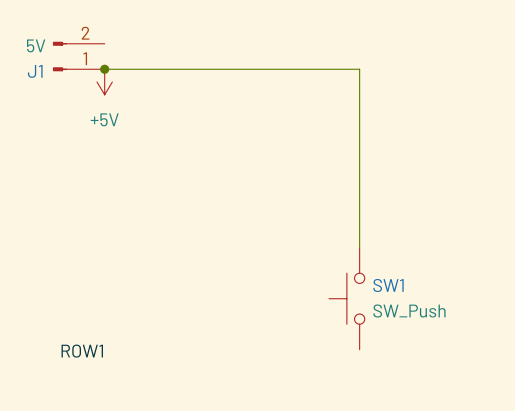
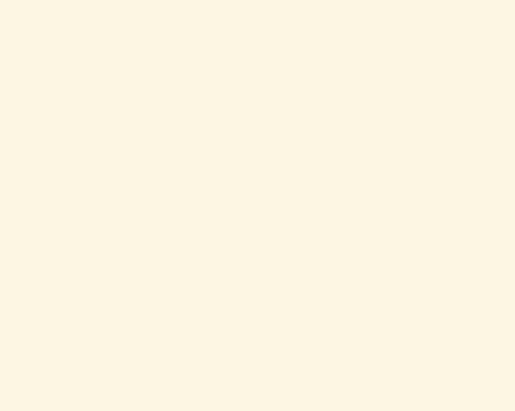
J1: 5V (78, 56) -> none
wire: (104, 69) (359, 69) (359, 247) -> none
junction: (104, 69) -> none
power symbol: +5V (104, 82) -> none
SW1: SW_Push (346, 298) -> none
label: ROW1 (82, 351) -> none

